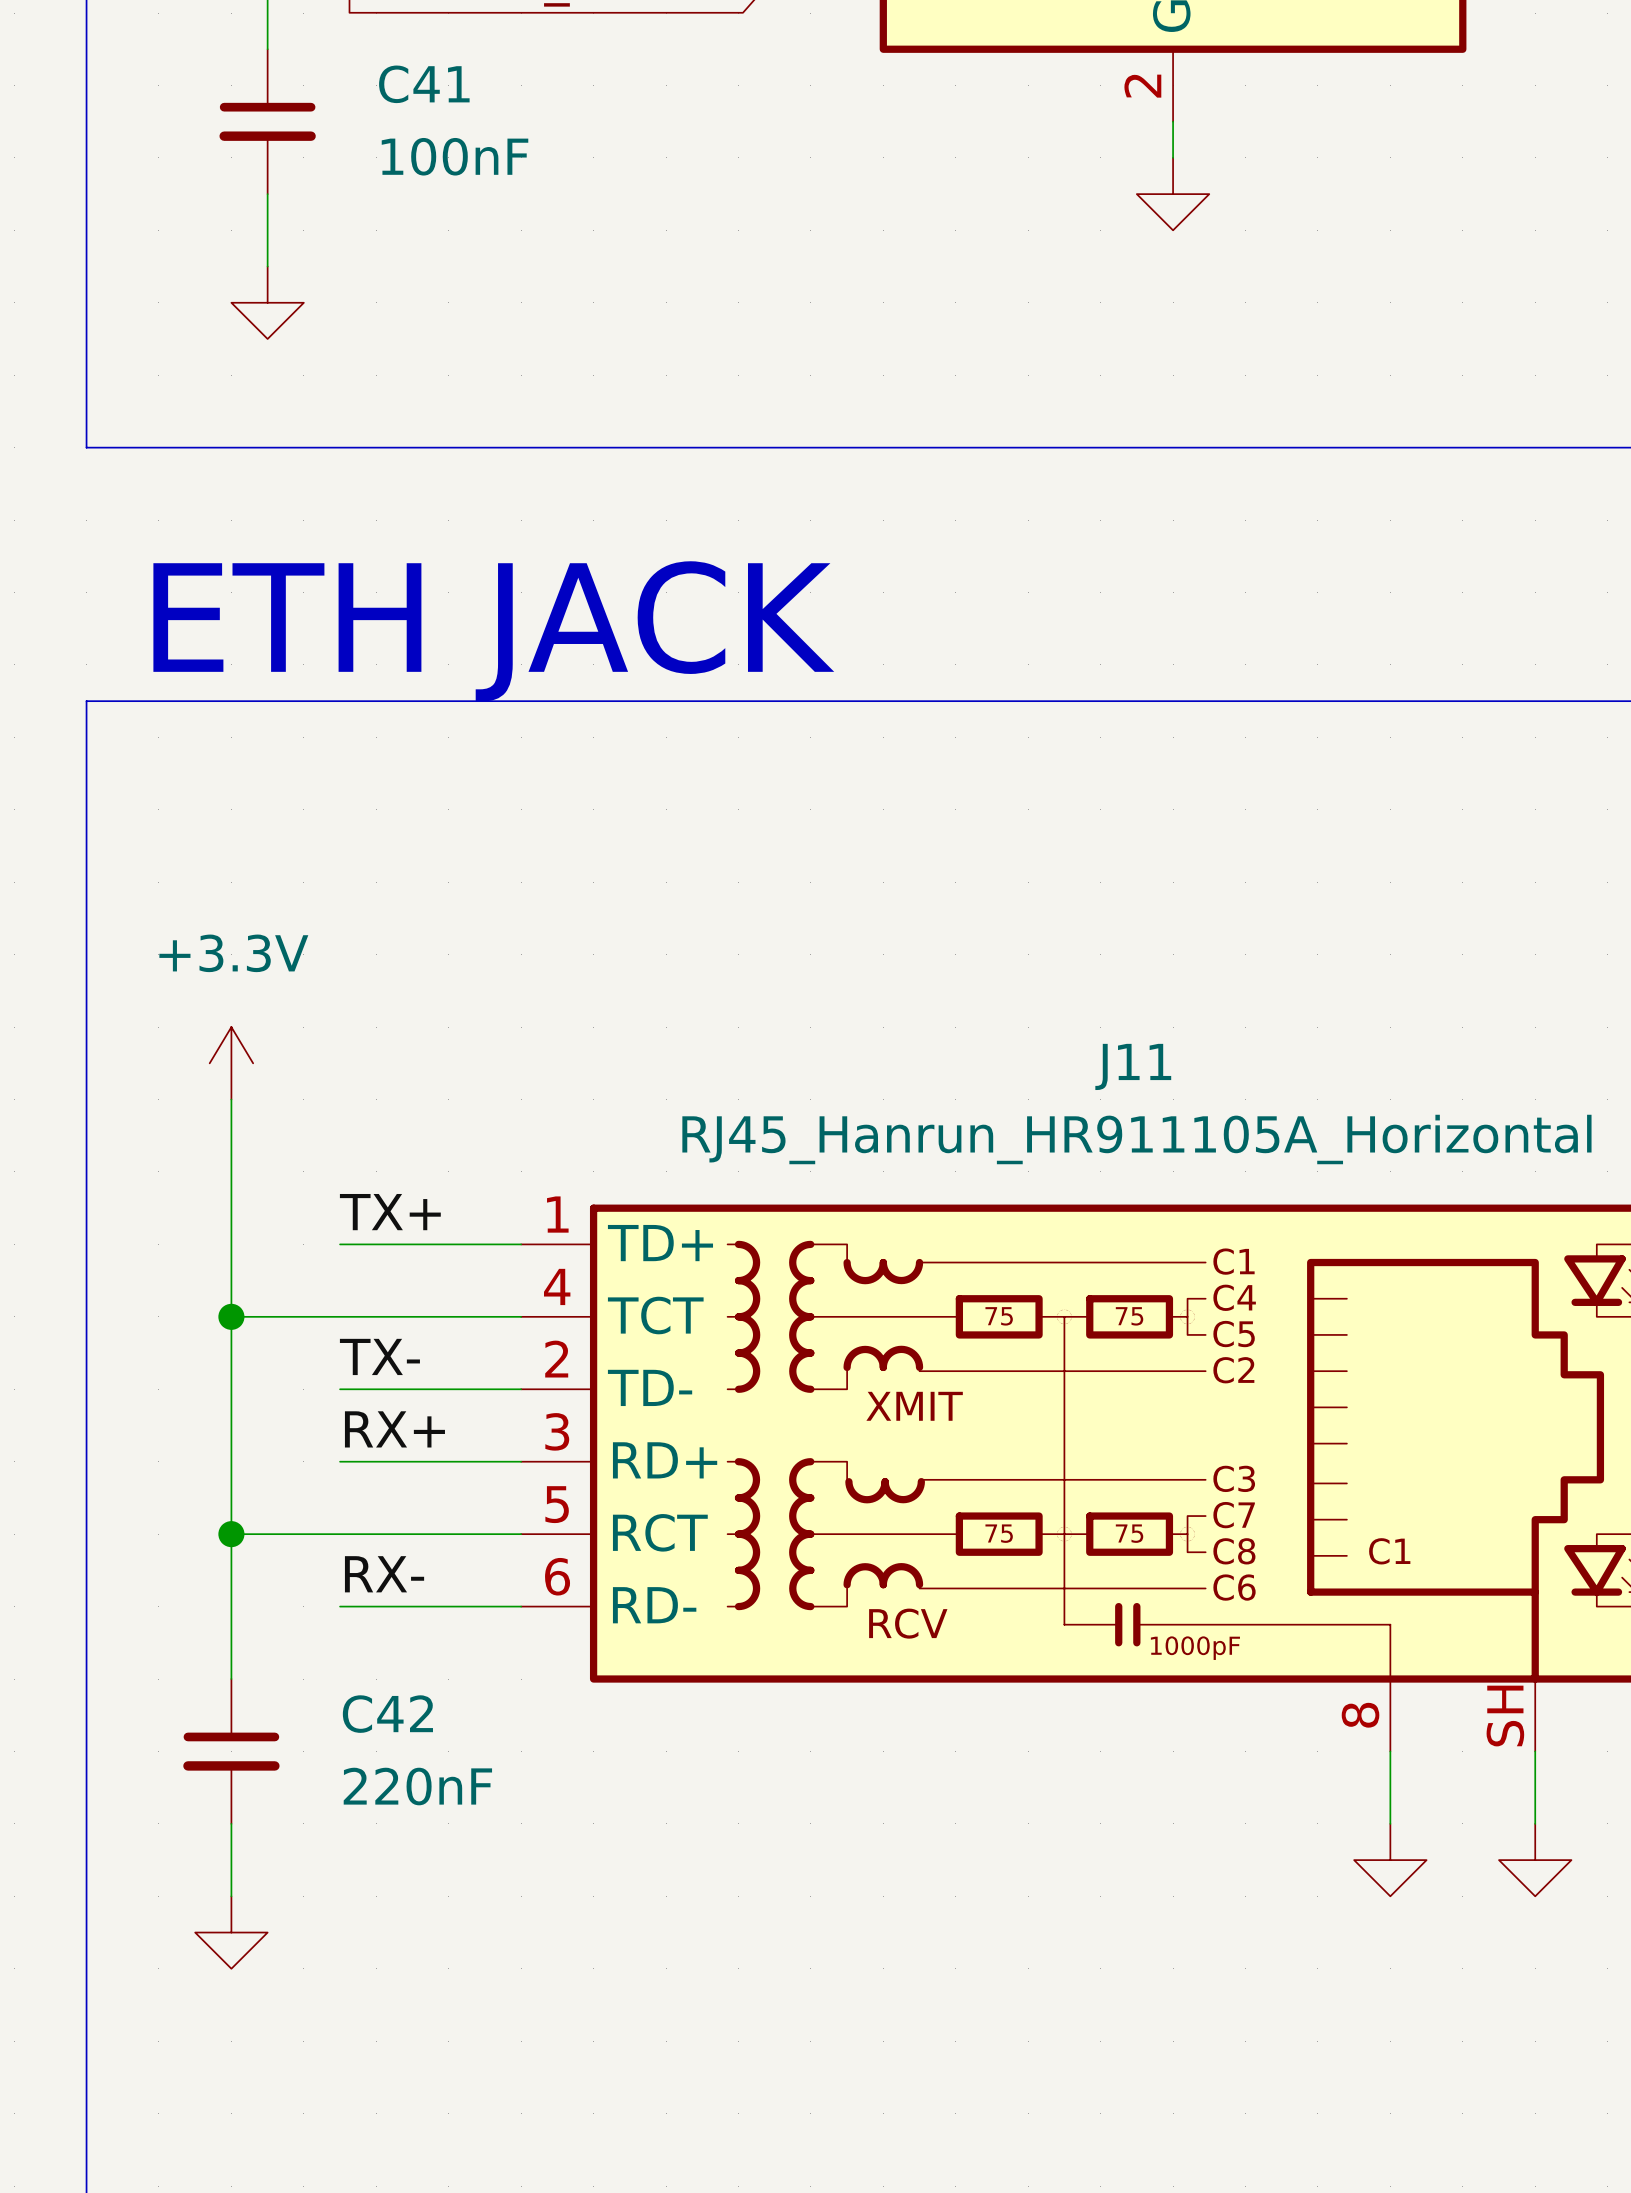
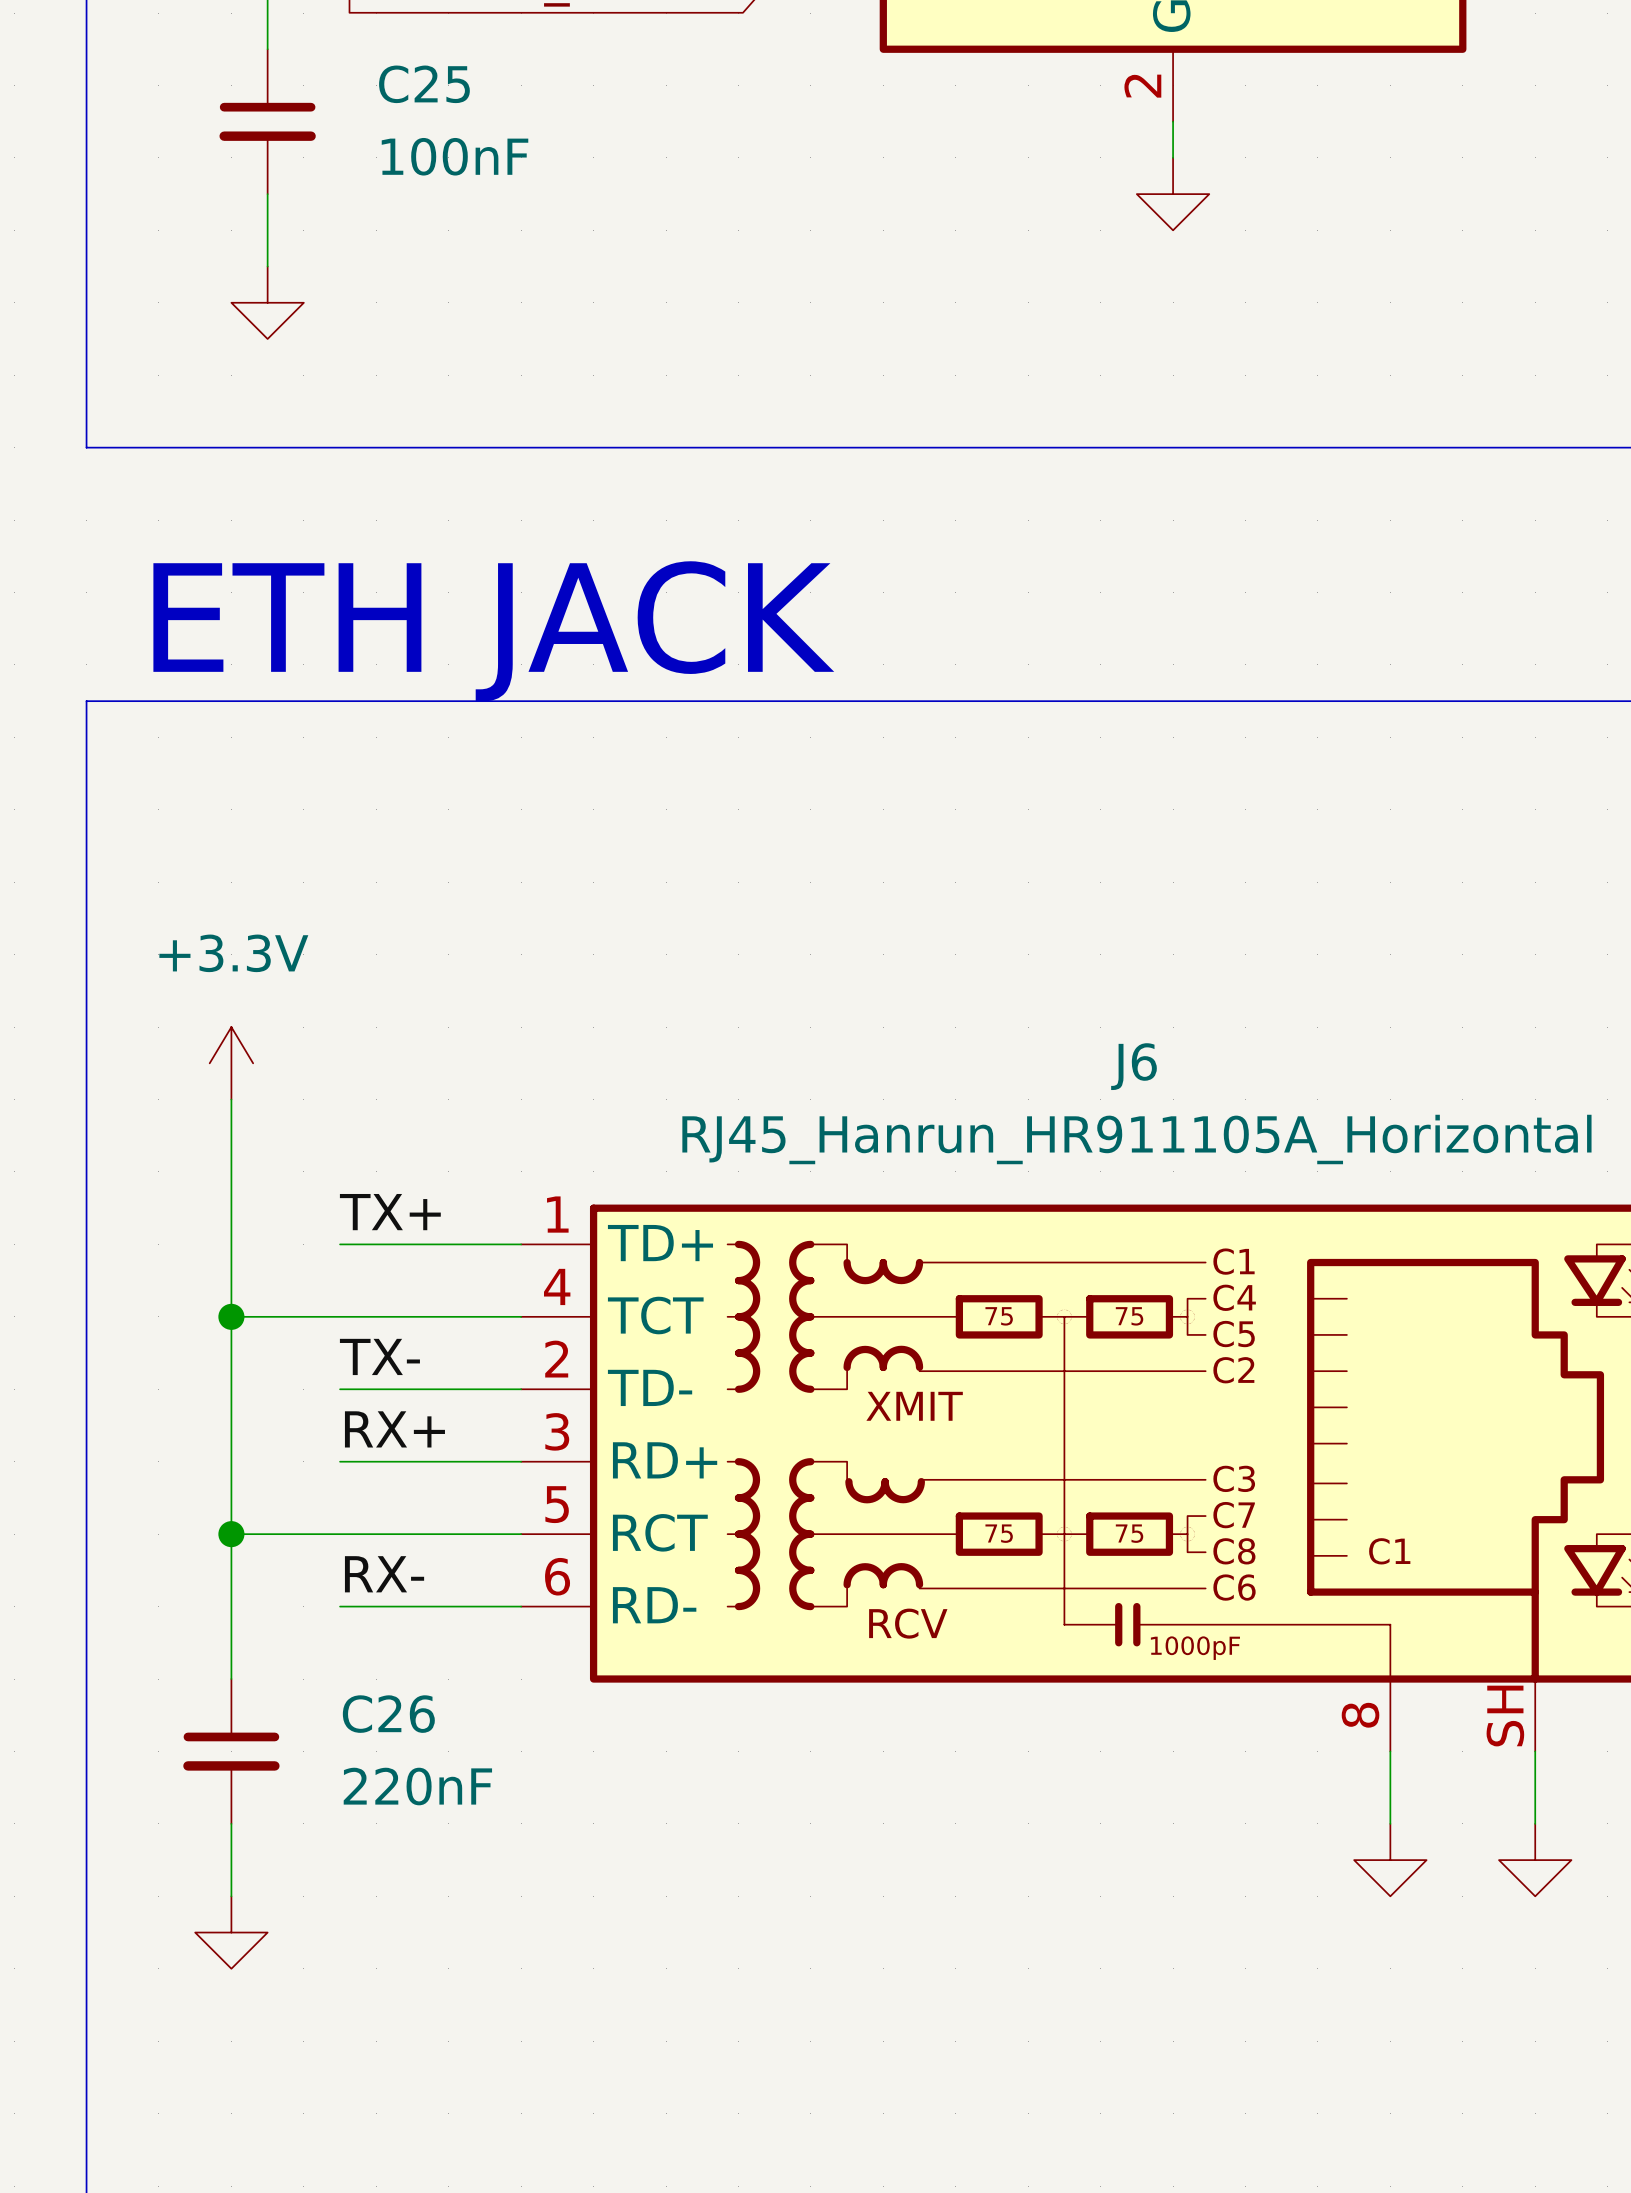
C41 name: C41 (424, 84) -> C25 (424, 84)
J11 name: J11 (1133, 1066) -> J6 (1133, 1066)
C42 name: C42 (387, 1714) -> C26 (388, 1714)

